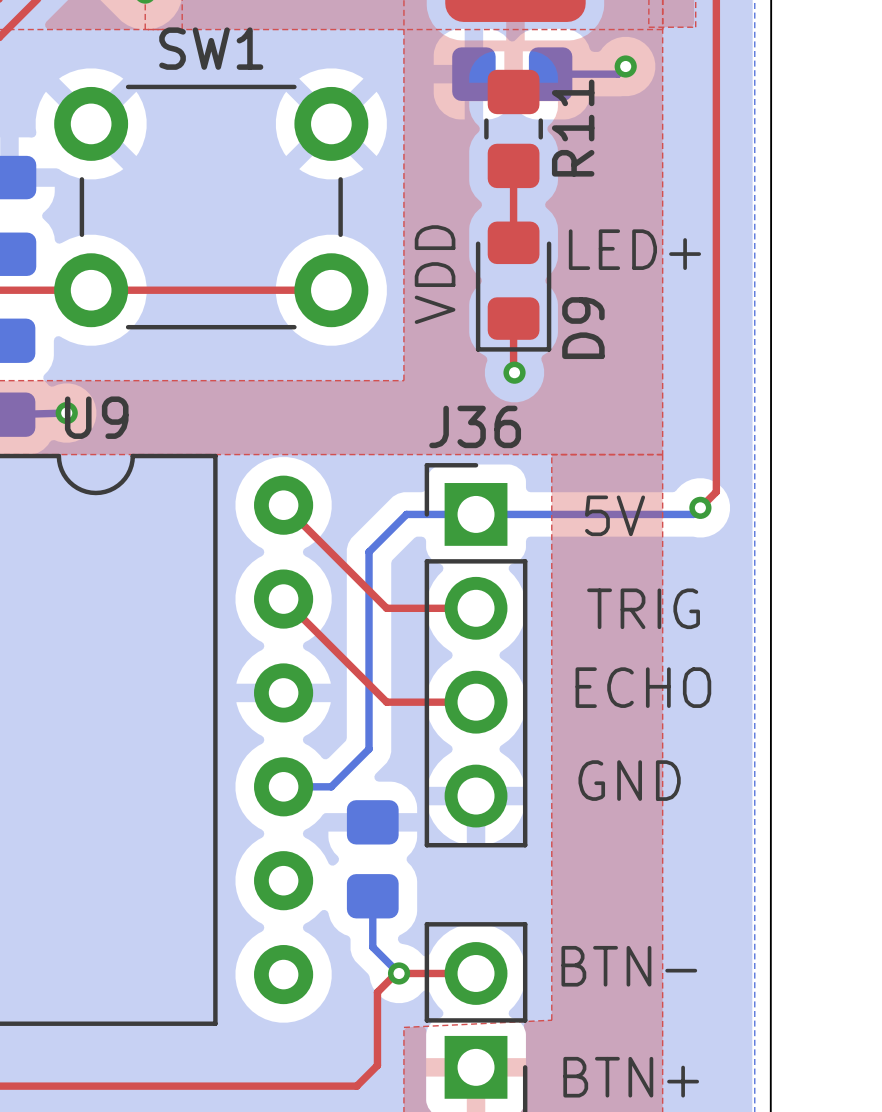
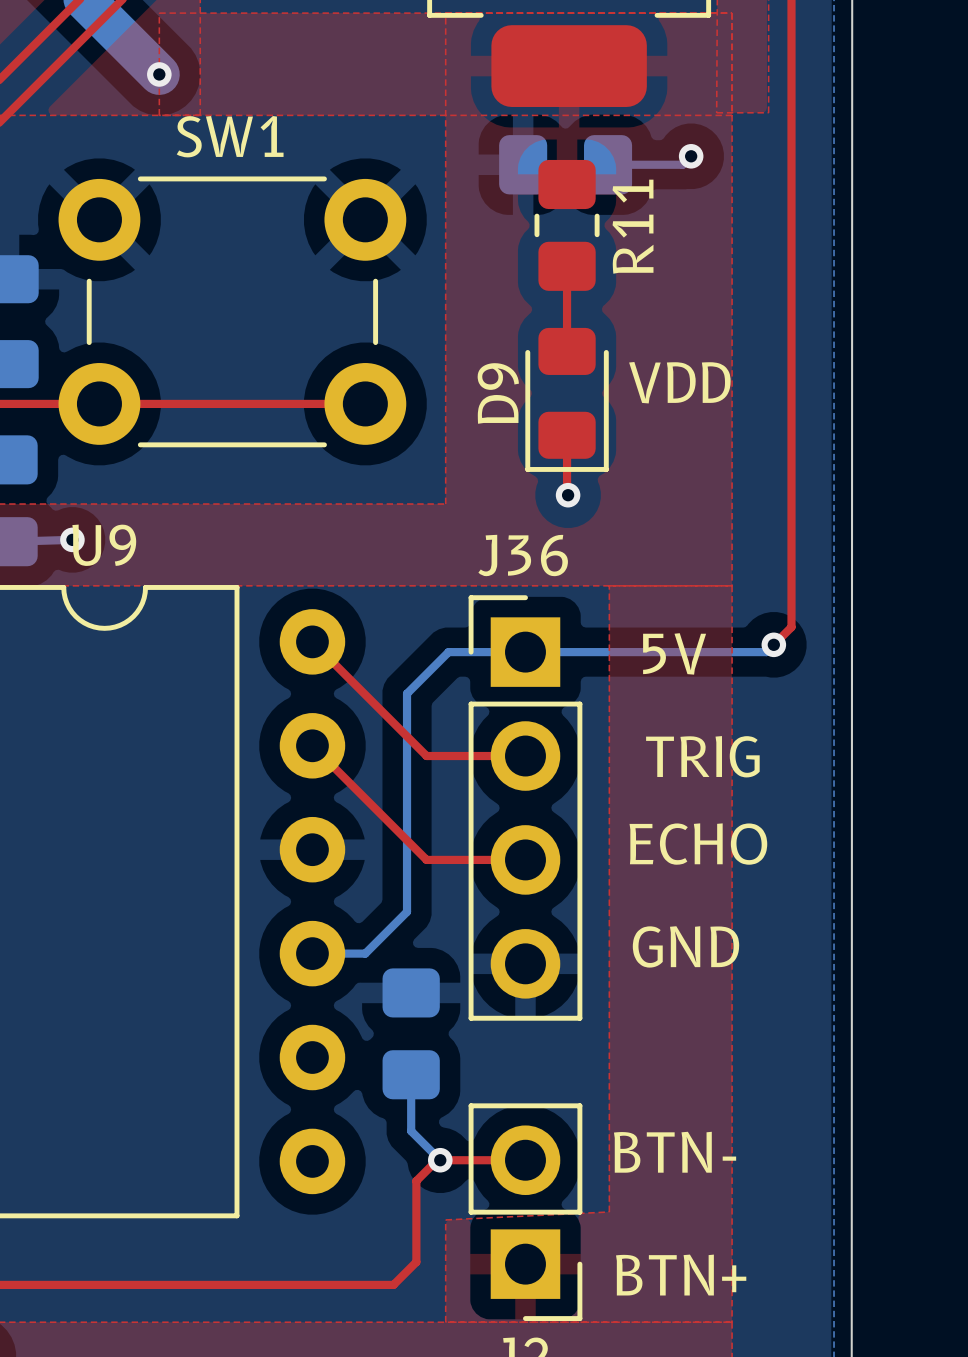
text: LED+ (634, 249) -> VDD (679, 382)
text: VDD (435, 274) -> none
D9 name position: D9 (583, 328) -> D9 (498, 393)

